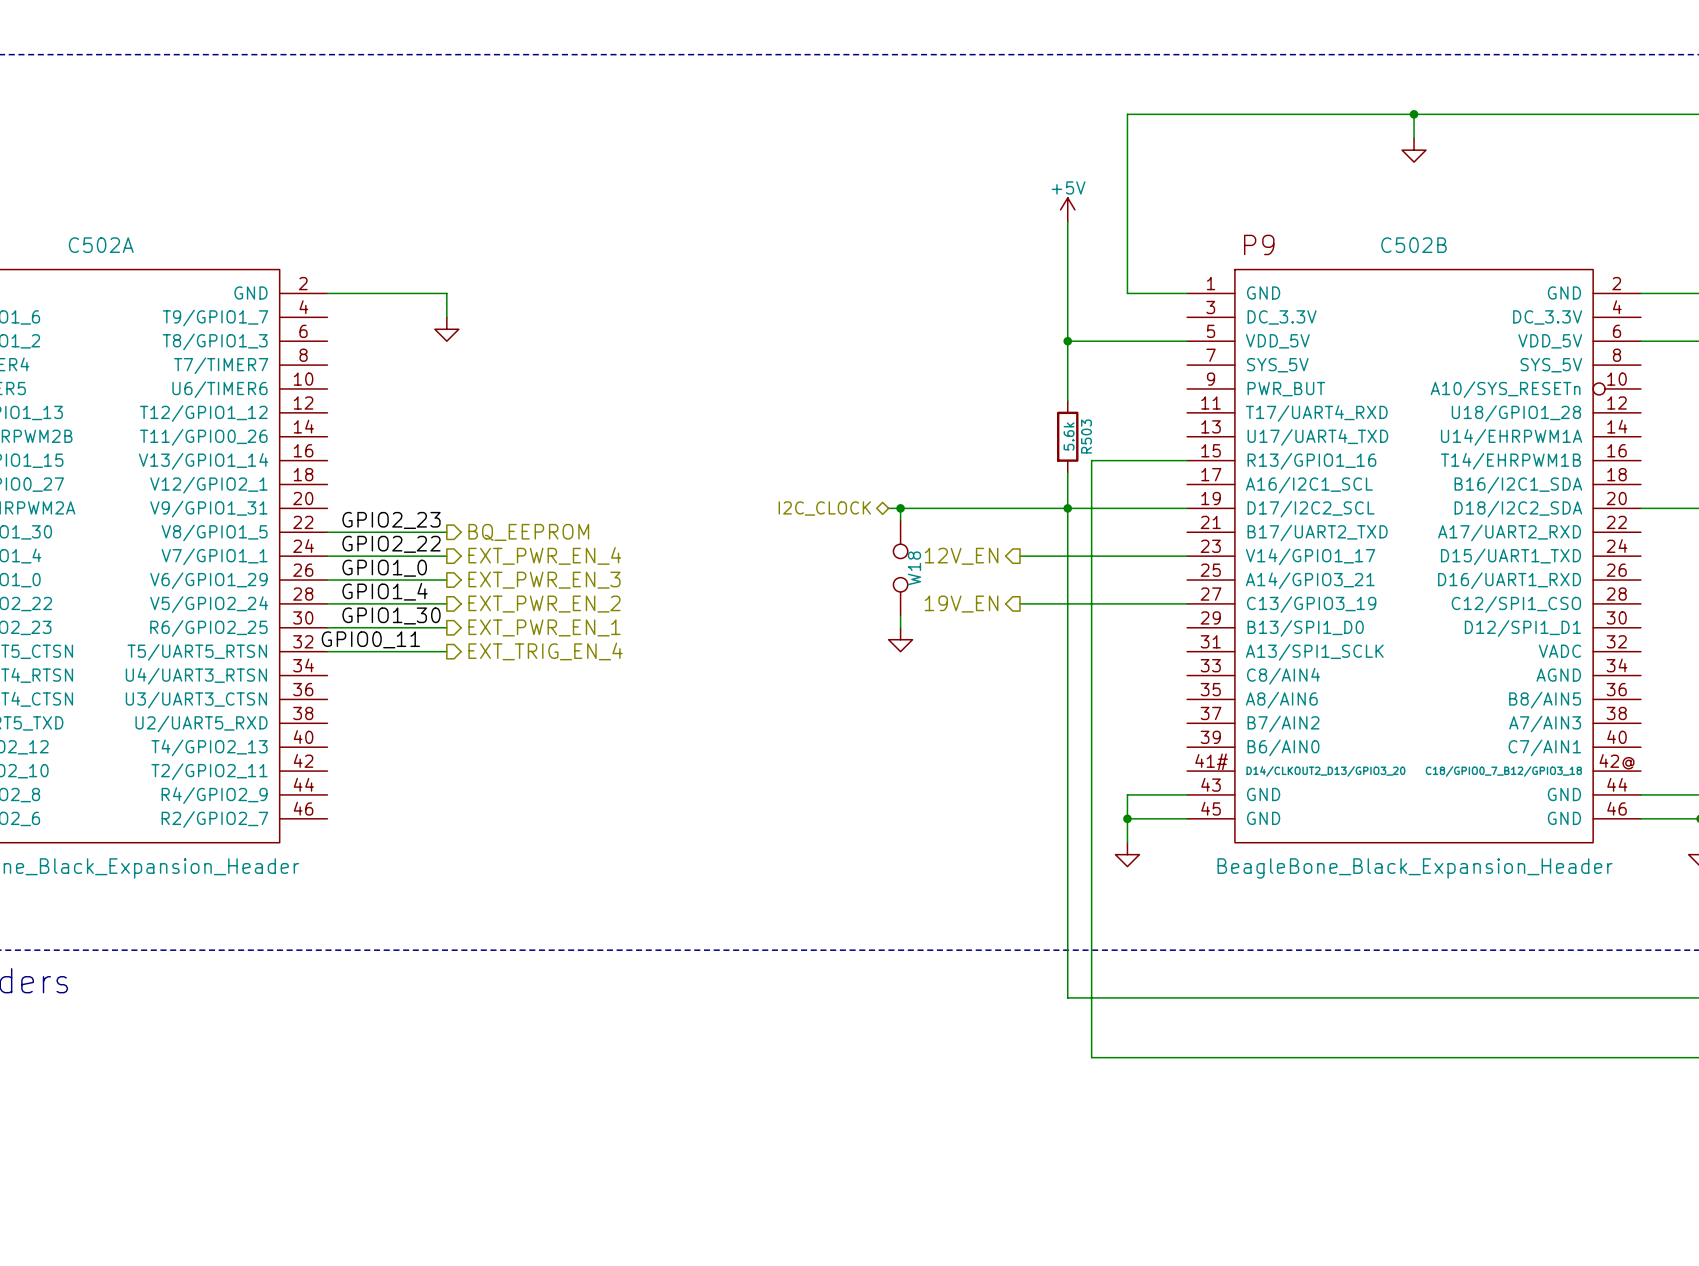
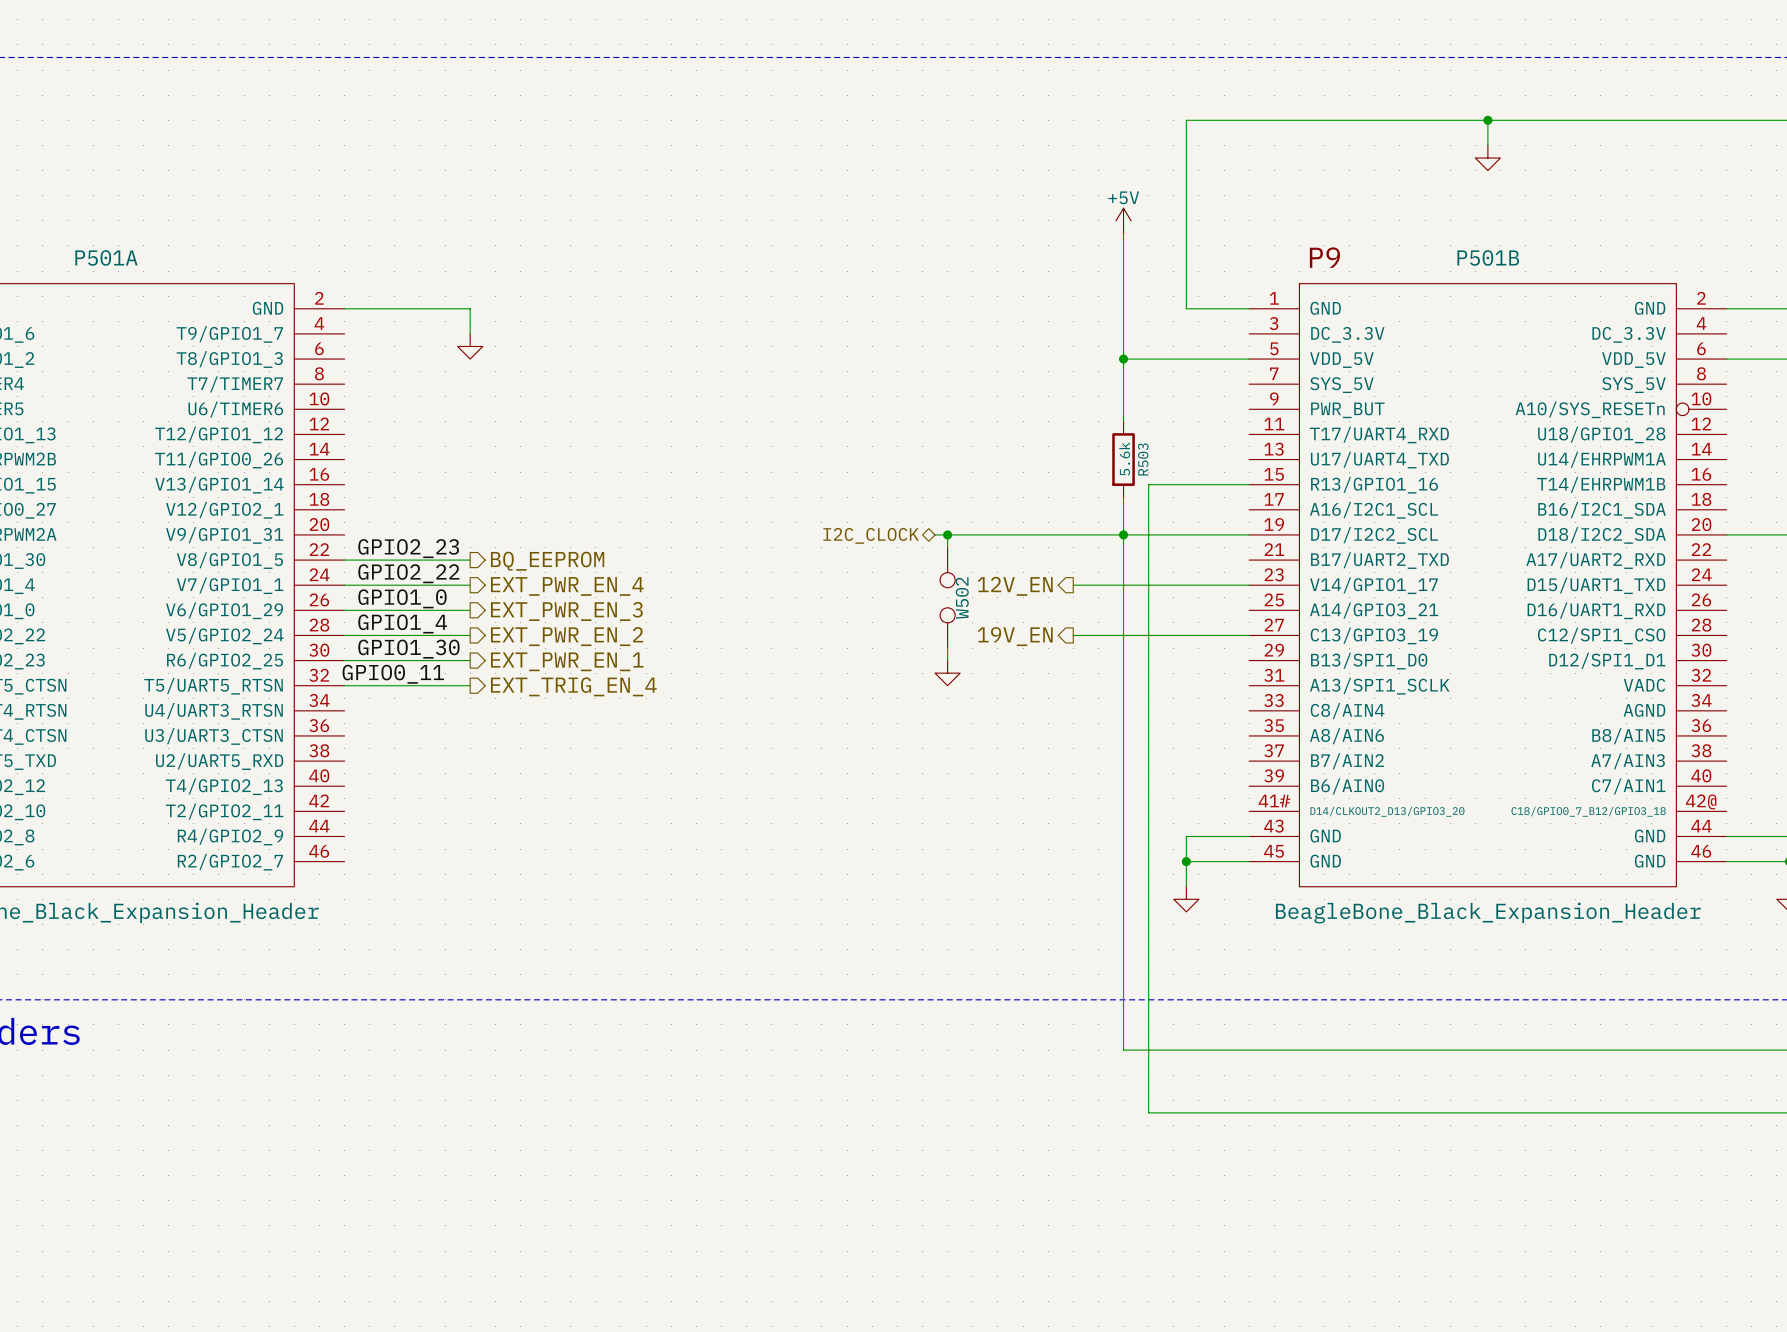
C502A name: C502A (101, 245) -> P501A (106, 257)
C502B name: C502B (1414, 245) -> P501B (1488, 257)
W18 name: W18 (914, 568) -> W502 (962, 598)

